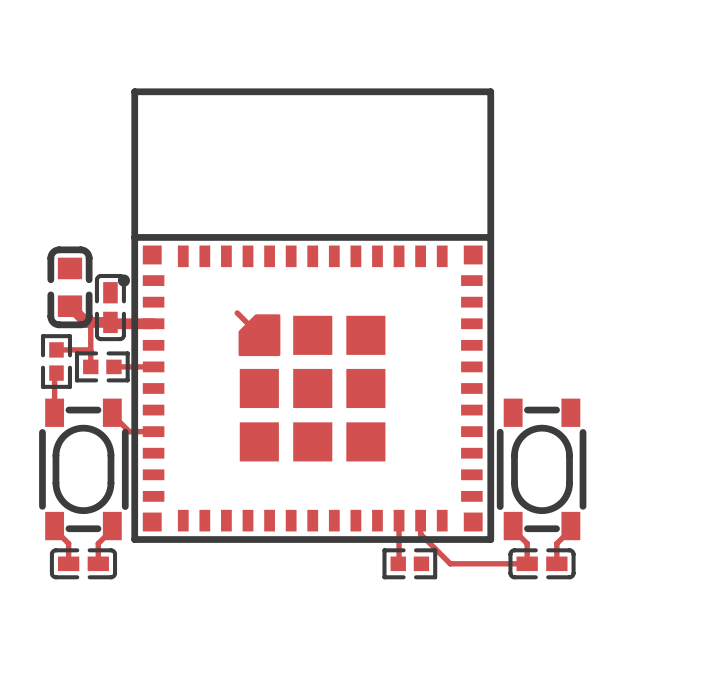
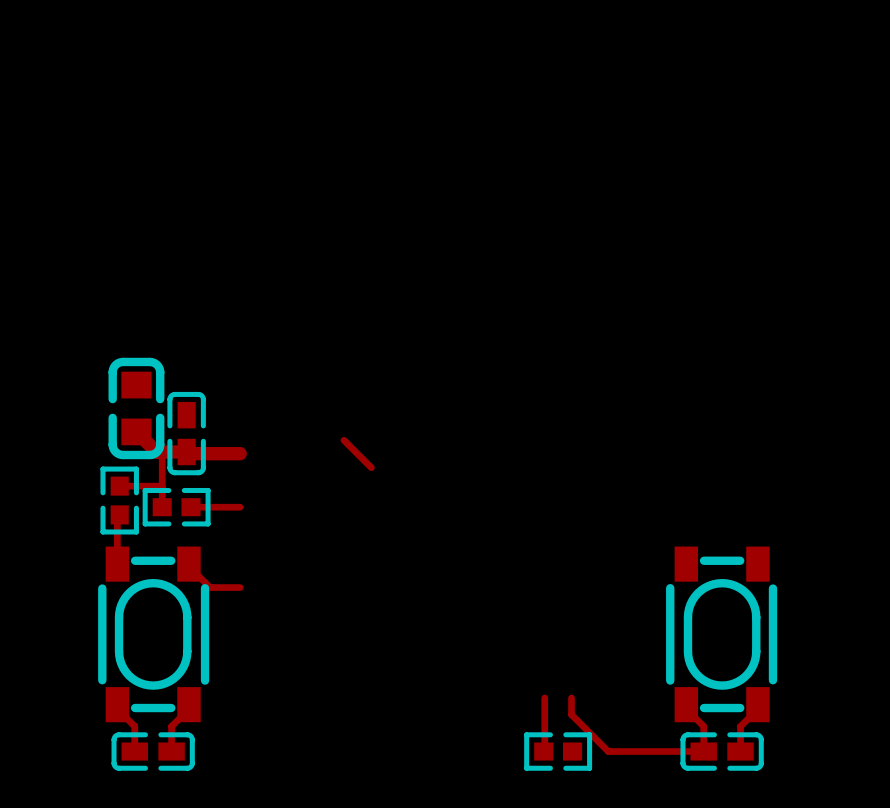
part: (305, 315) -> none

